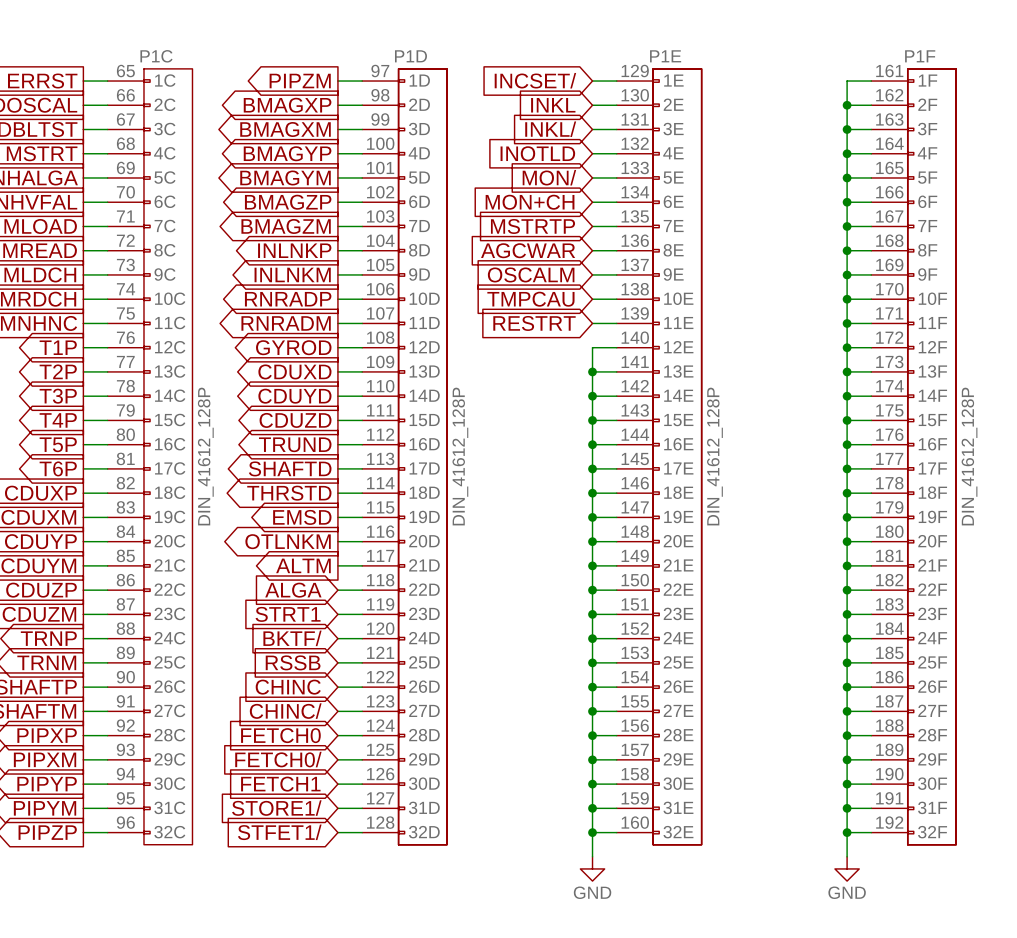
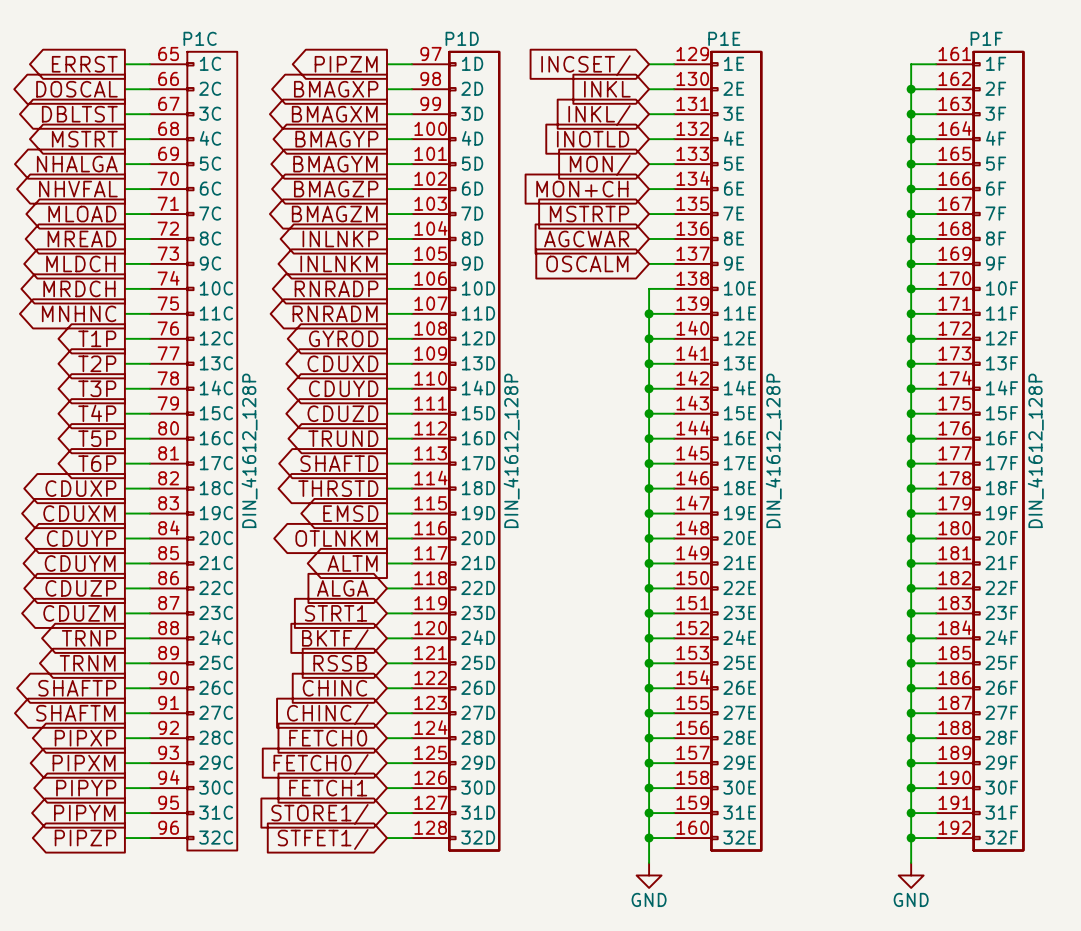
global label: TMPCAU (530, 299) -> none
wire: none -> (649, 288) (649, 338)
global label: RESTRT (534, 323) -> none
junction: none -> (649, 313)
junction: none -> (649, 338)

